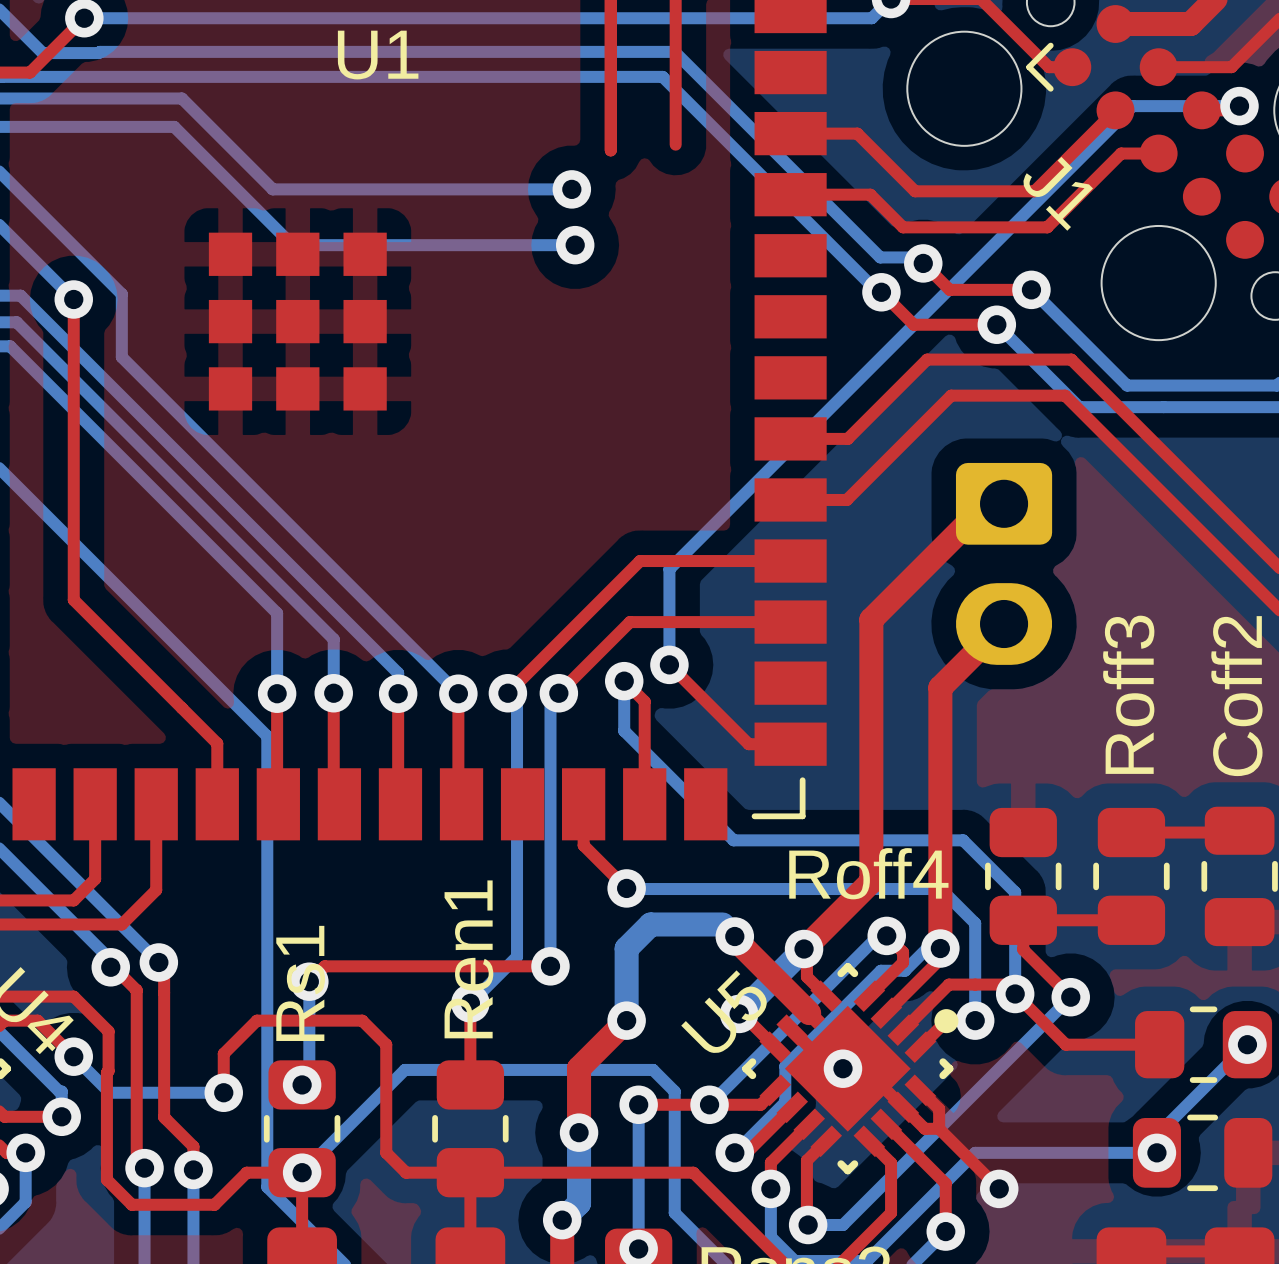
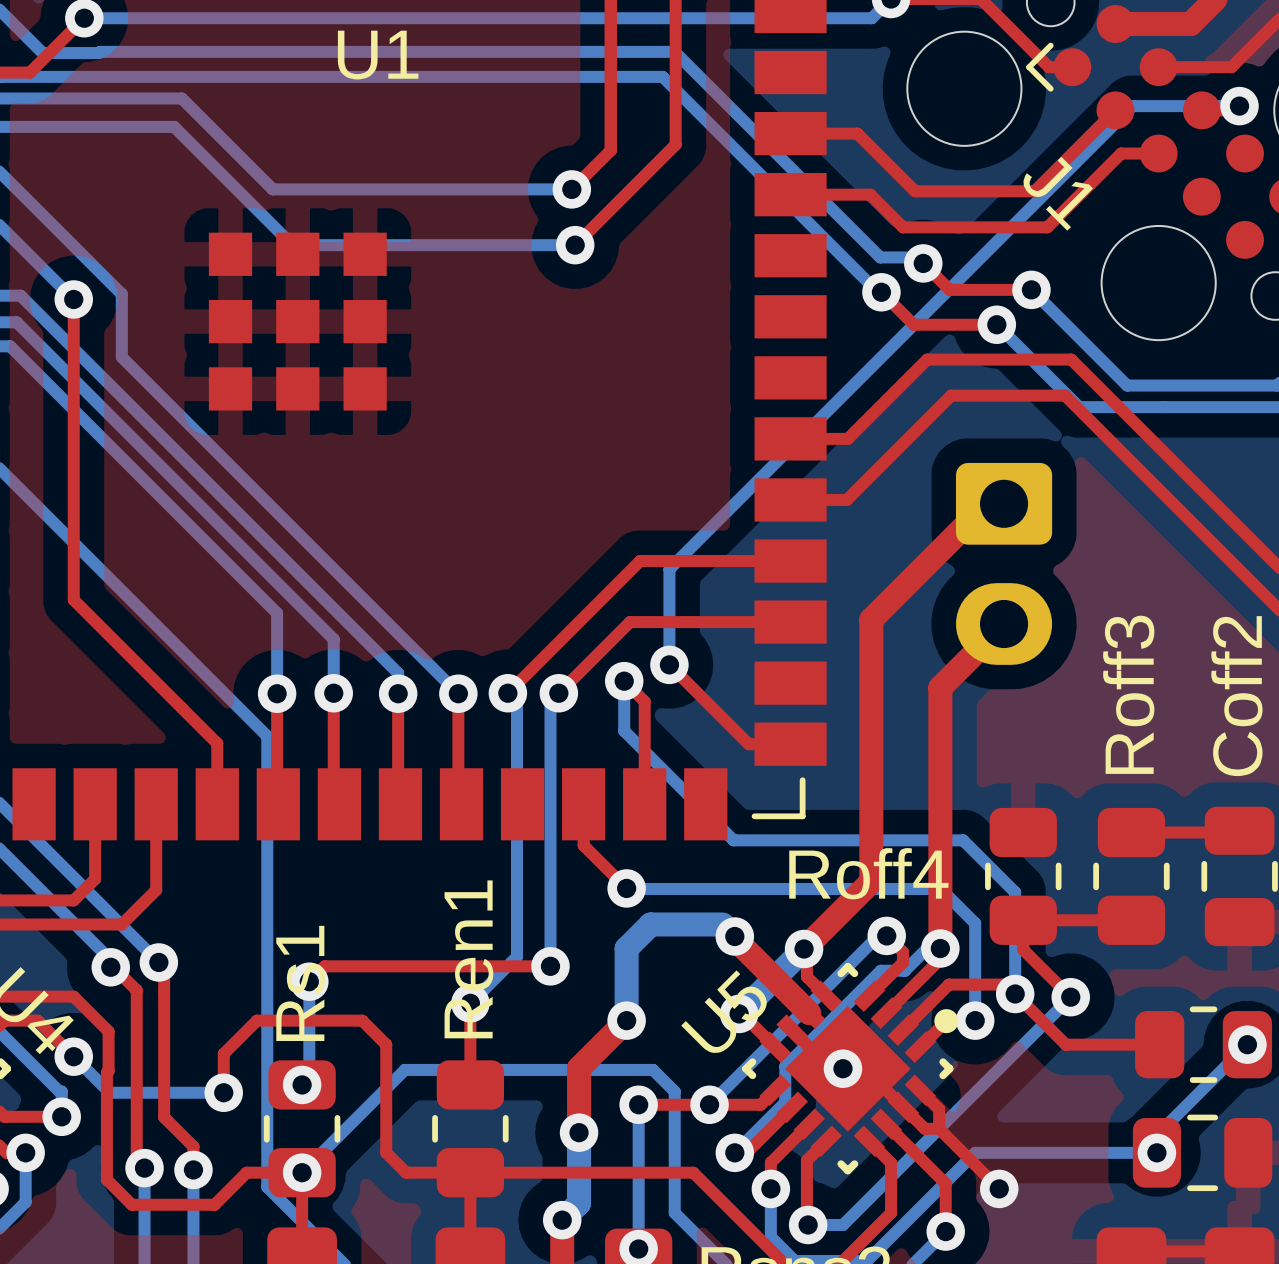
top track: none -> (675, 144) (575, 245)
top track: none -> (610, 150) (571, 189)

